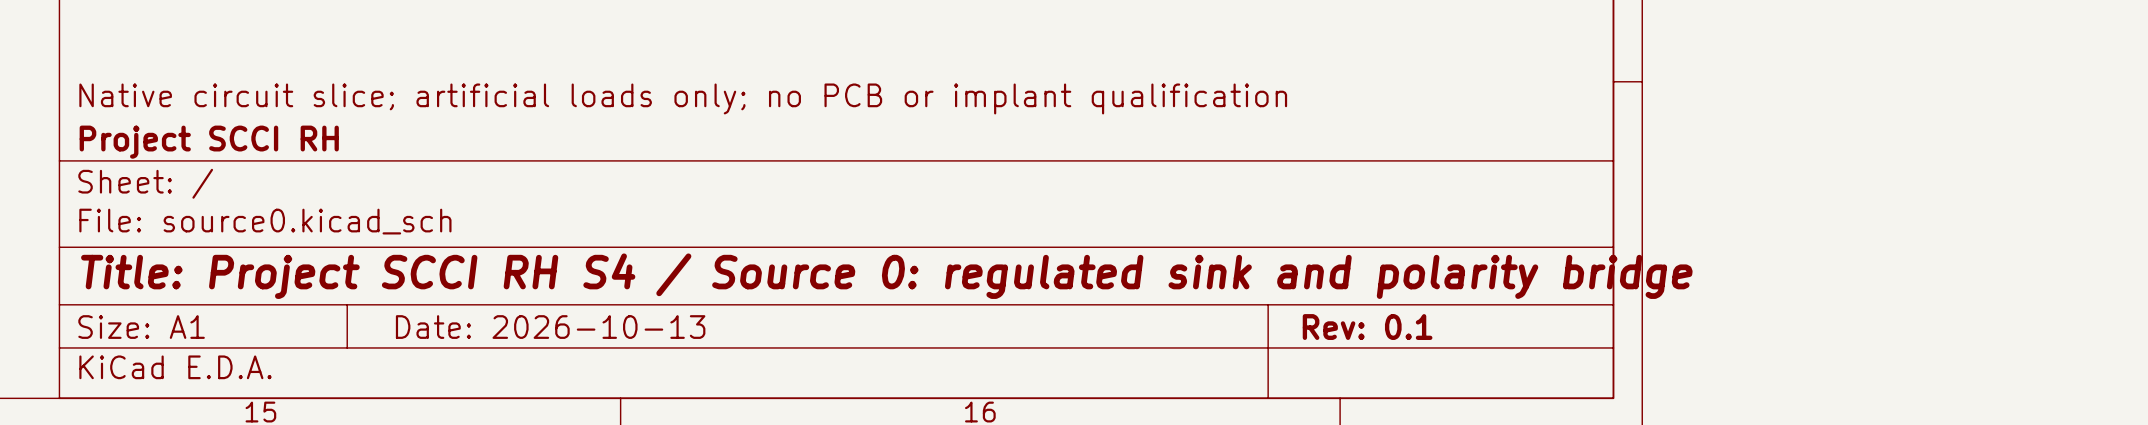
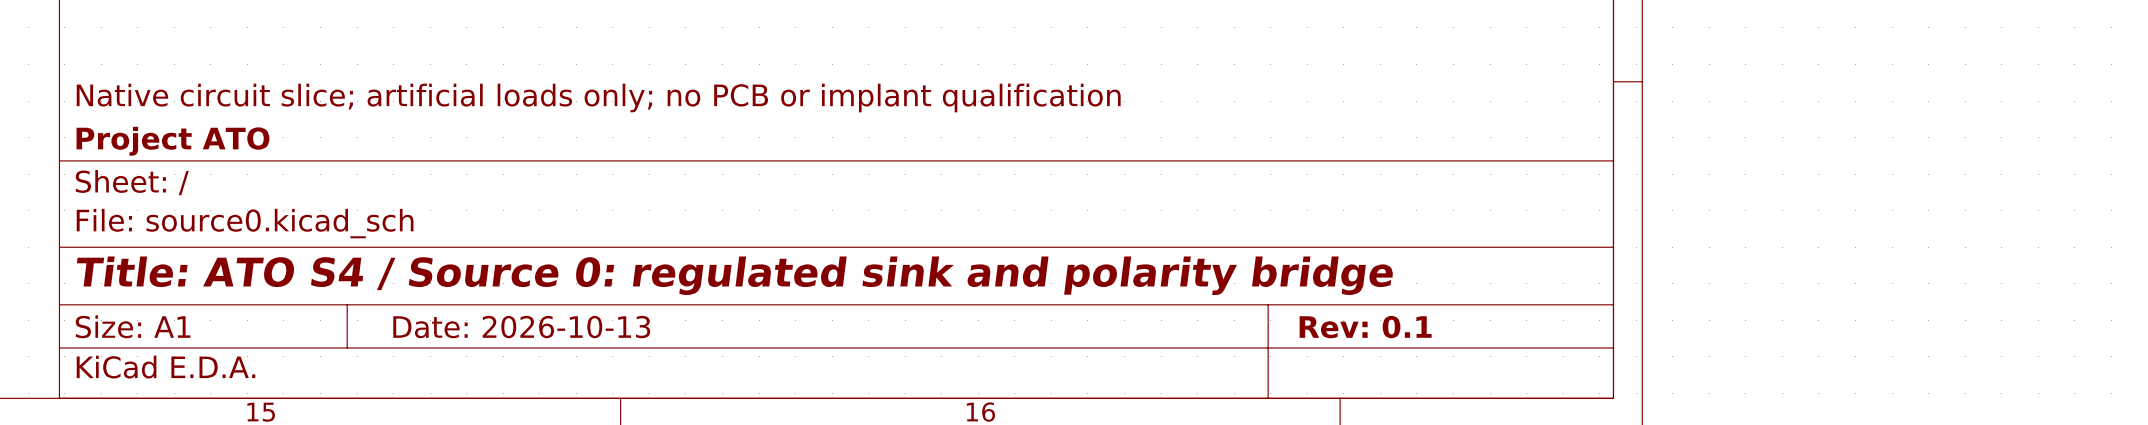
title block: Project SCCI RH (209, 142) -> Project ATO (173, 141)
title block: Title: Project SCCI RH S4 / Source 0: regulated sink and polarity bridge (886, 276) -> Title: ATO S4 / Source 0: regulated sink and polarity bridge (735, 275)

